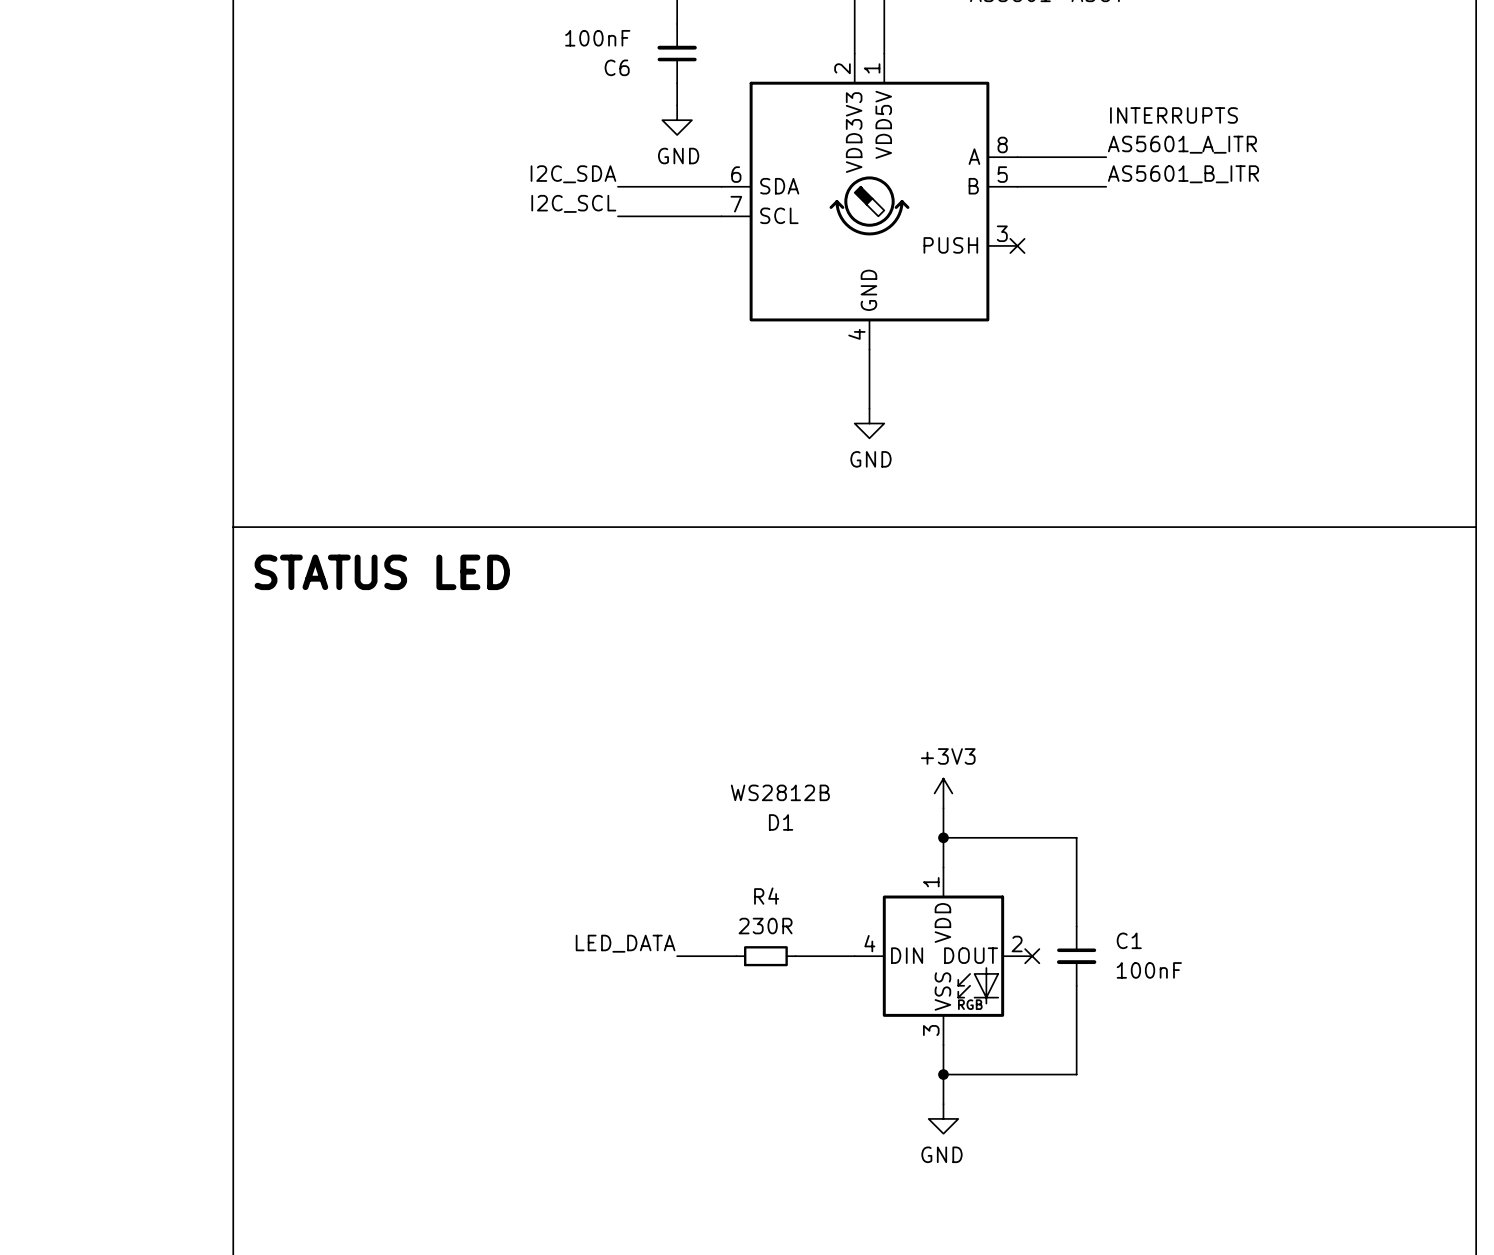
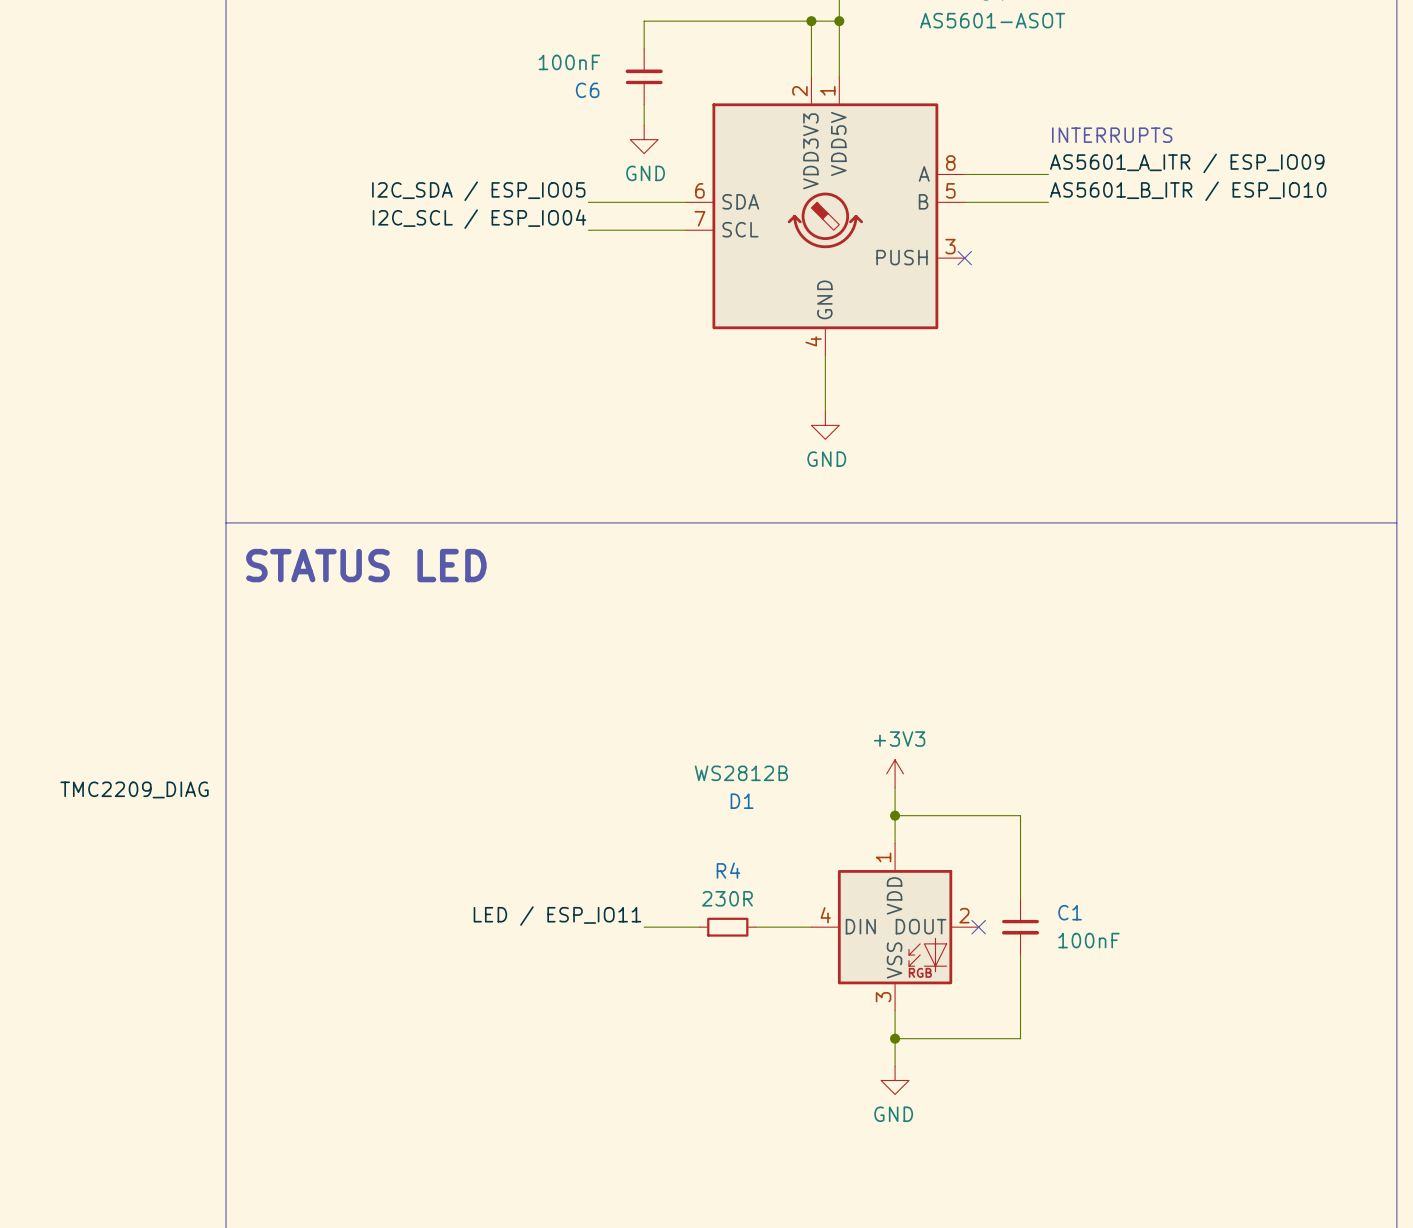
label: AS5601_A_ITR (1182, 144) -> AS5601_A_ITR / ESP_IO09 (1187, 163)
label: I2C_SDA (573, 174) -> I2C_SDA / ESP_IO05 (478, 191)
label: AS5601_B_ITR (1183, 174) -> AS5601_B_ITR / ESP_IO10 (1188, 191)
label: I2C_SCL (573, 203) -> I2C_SCL / ESP_IO04 (479, 219)
label: none -> TMC2209_DIAG (134, 789)
label: LED_DATA (625, 943) -> LED / ESP_IO11 (557, 916)

